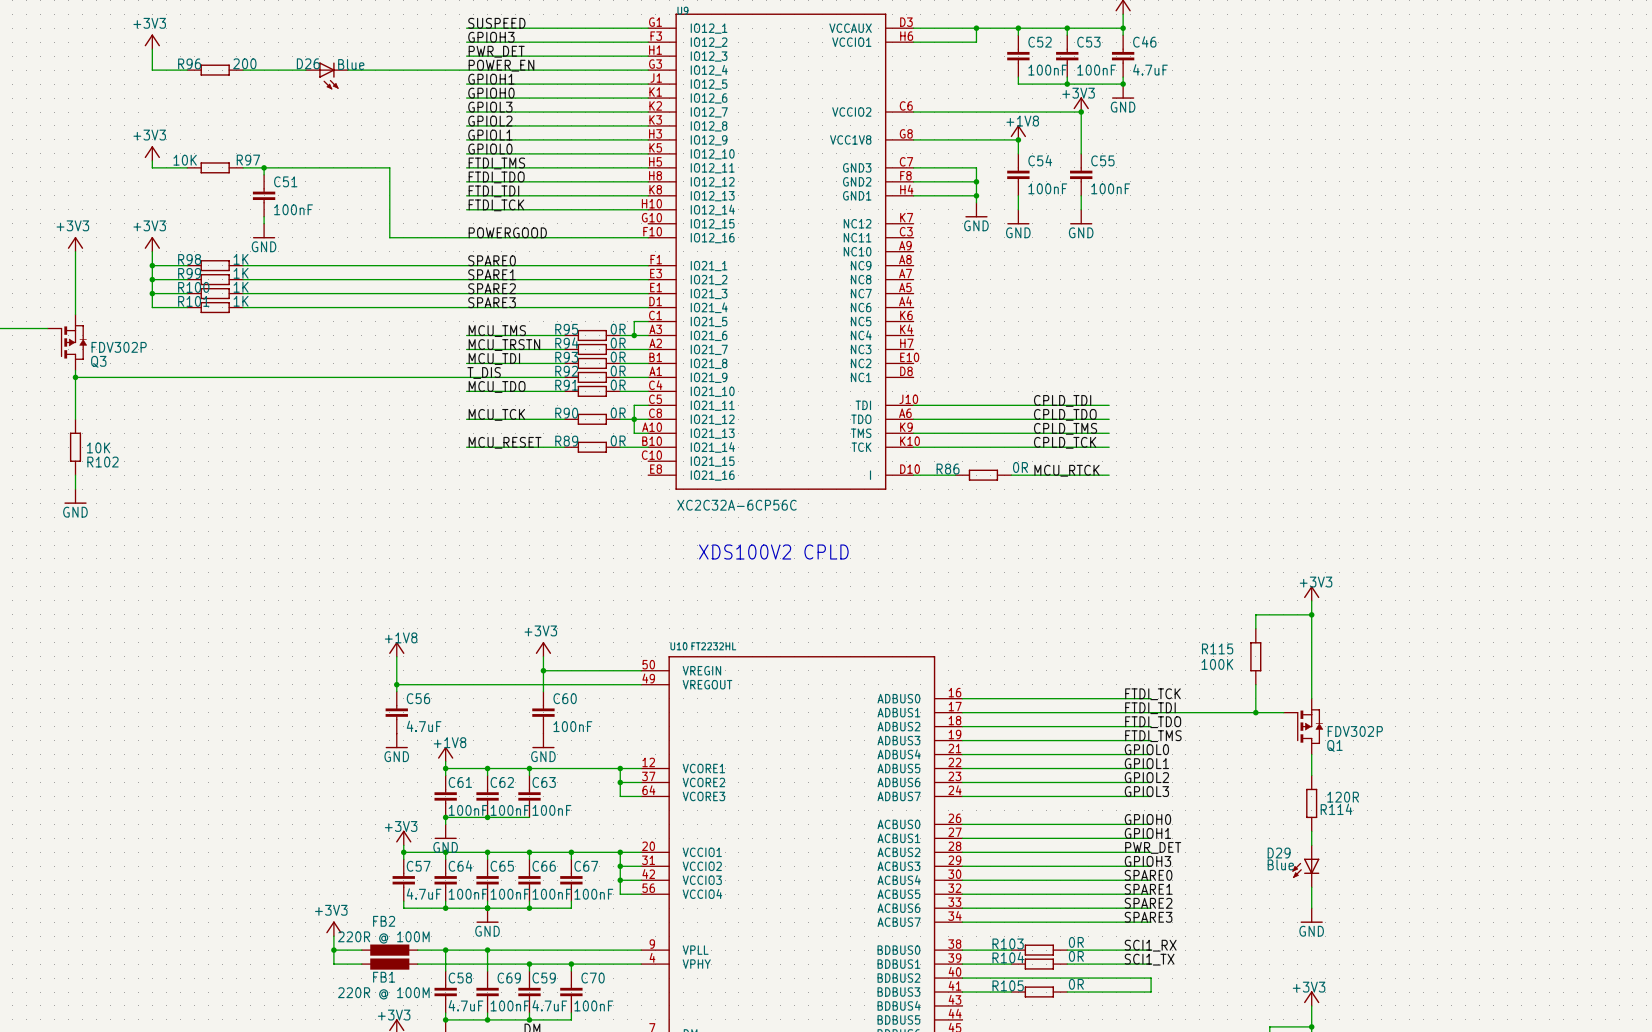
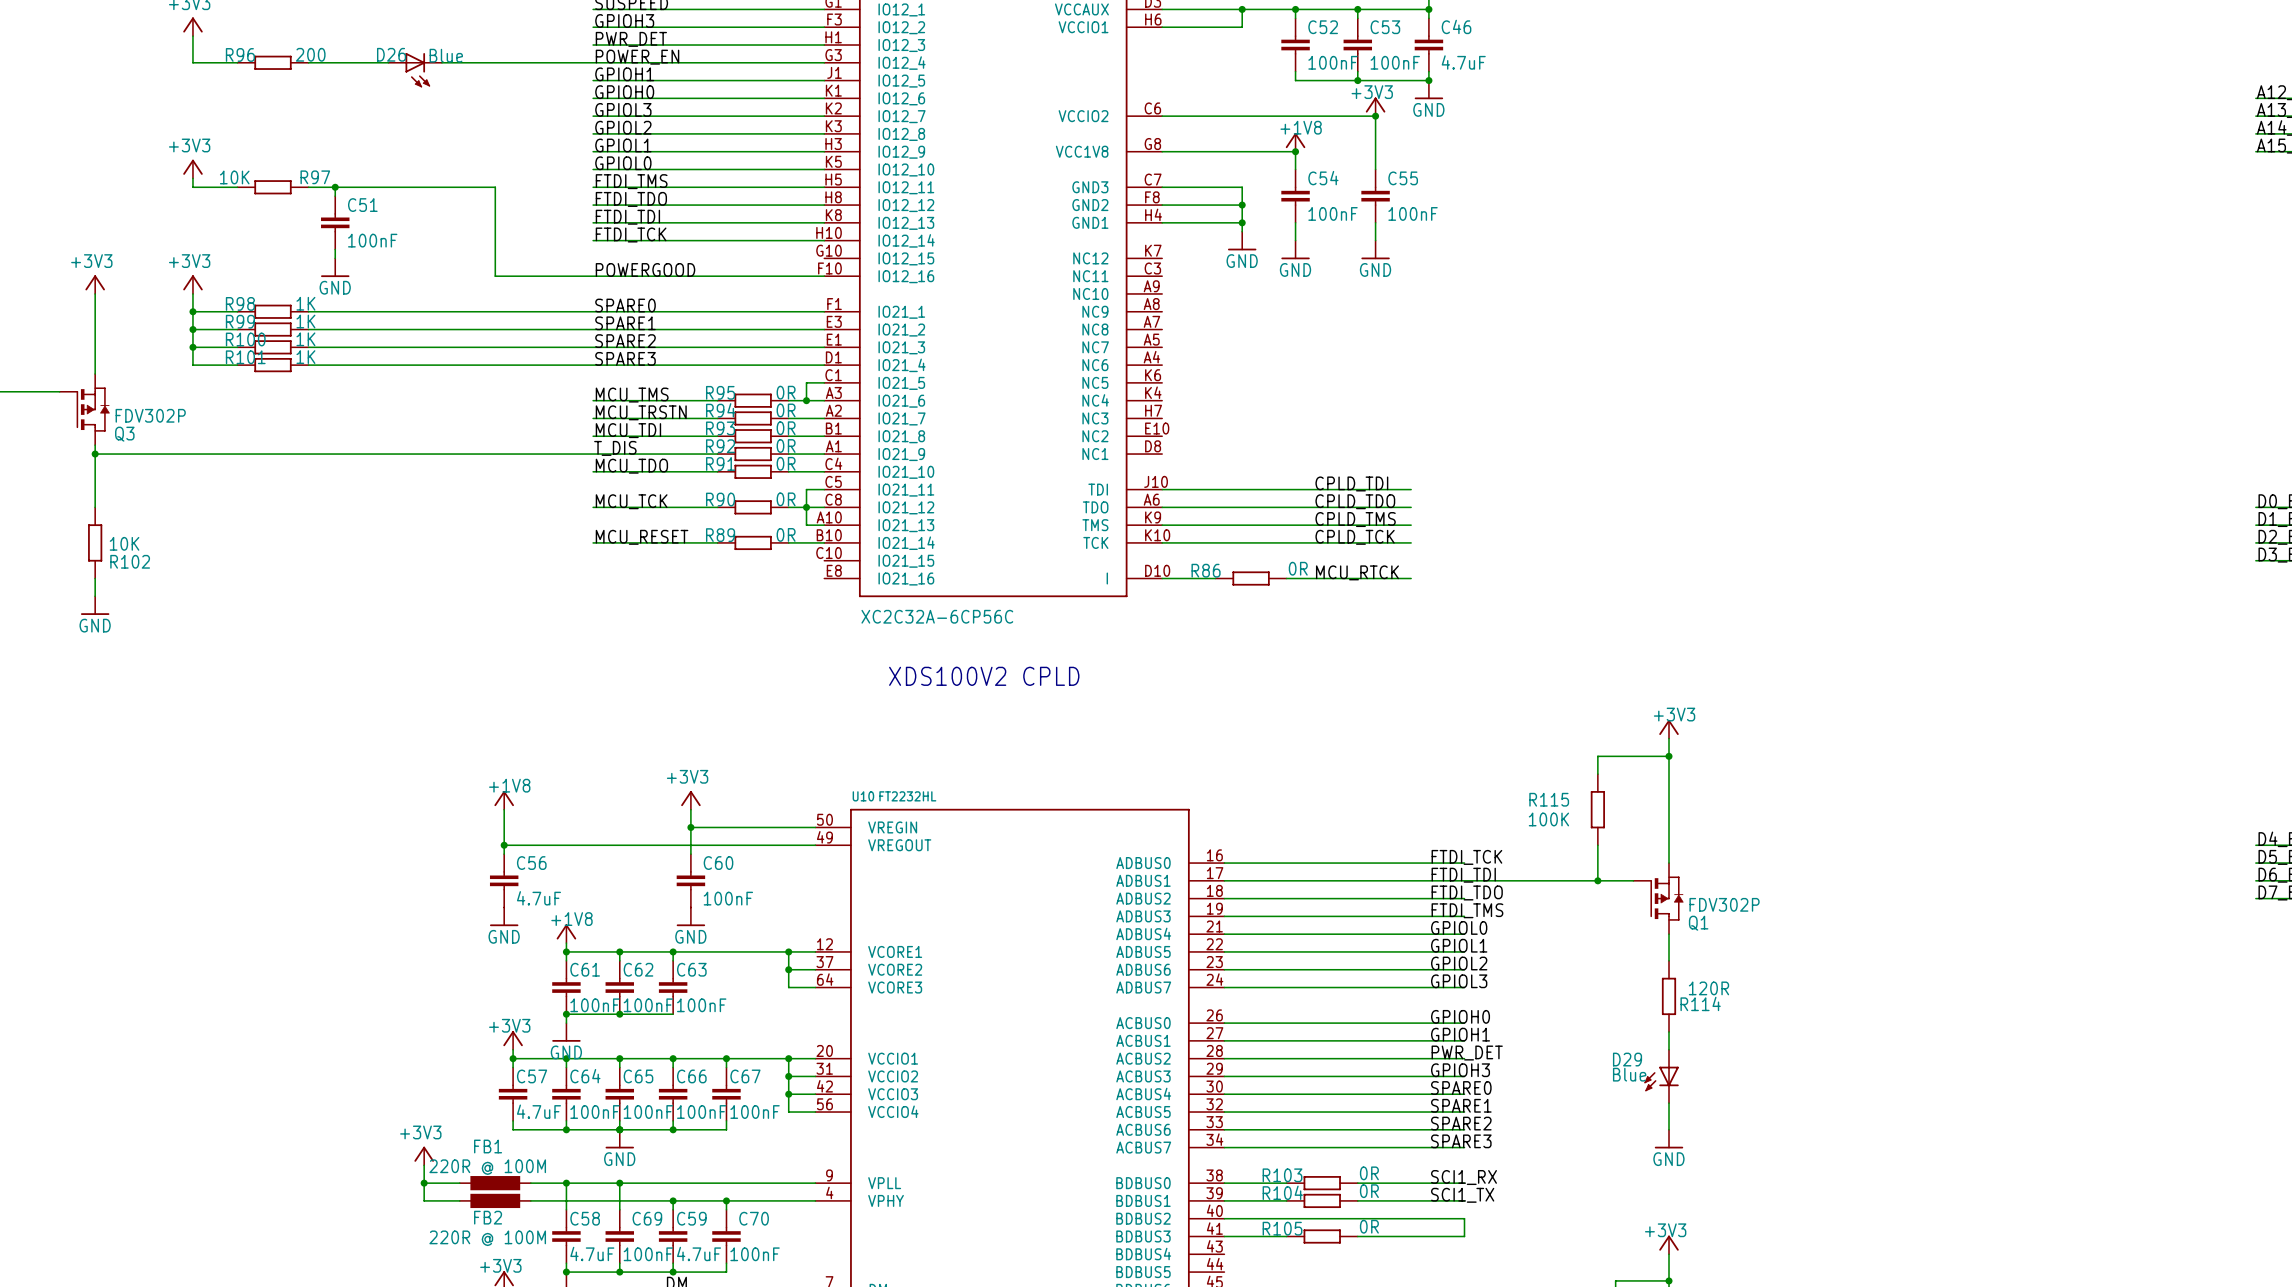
FB2 name position: FB2 (384, 921) -> FB2 (488, 1217)
FB1 name position: FB1 (384, 977) -> FB1 (488, 1146)

